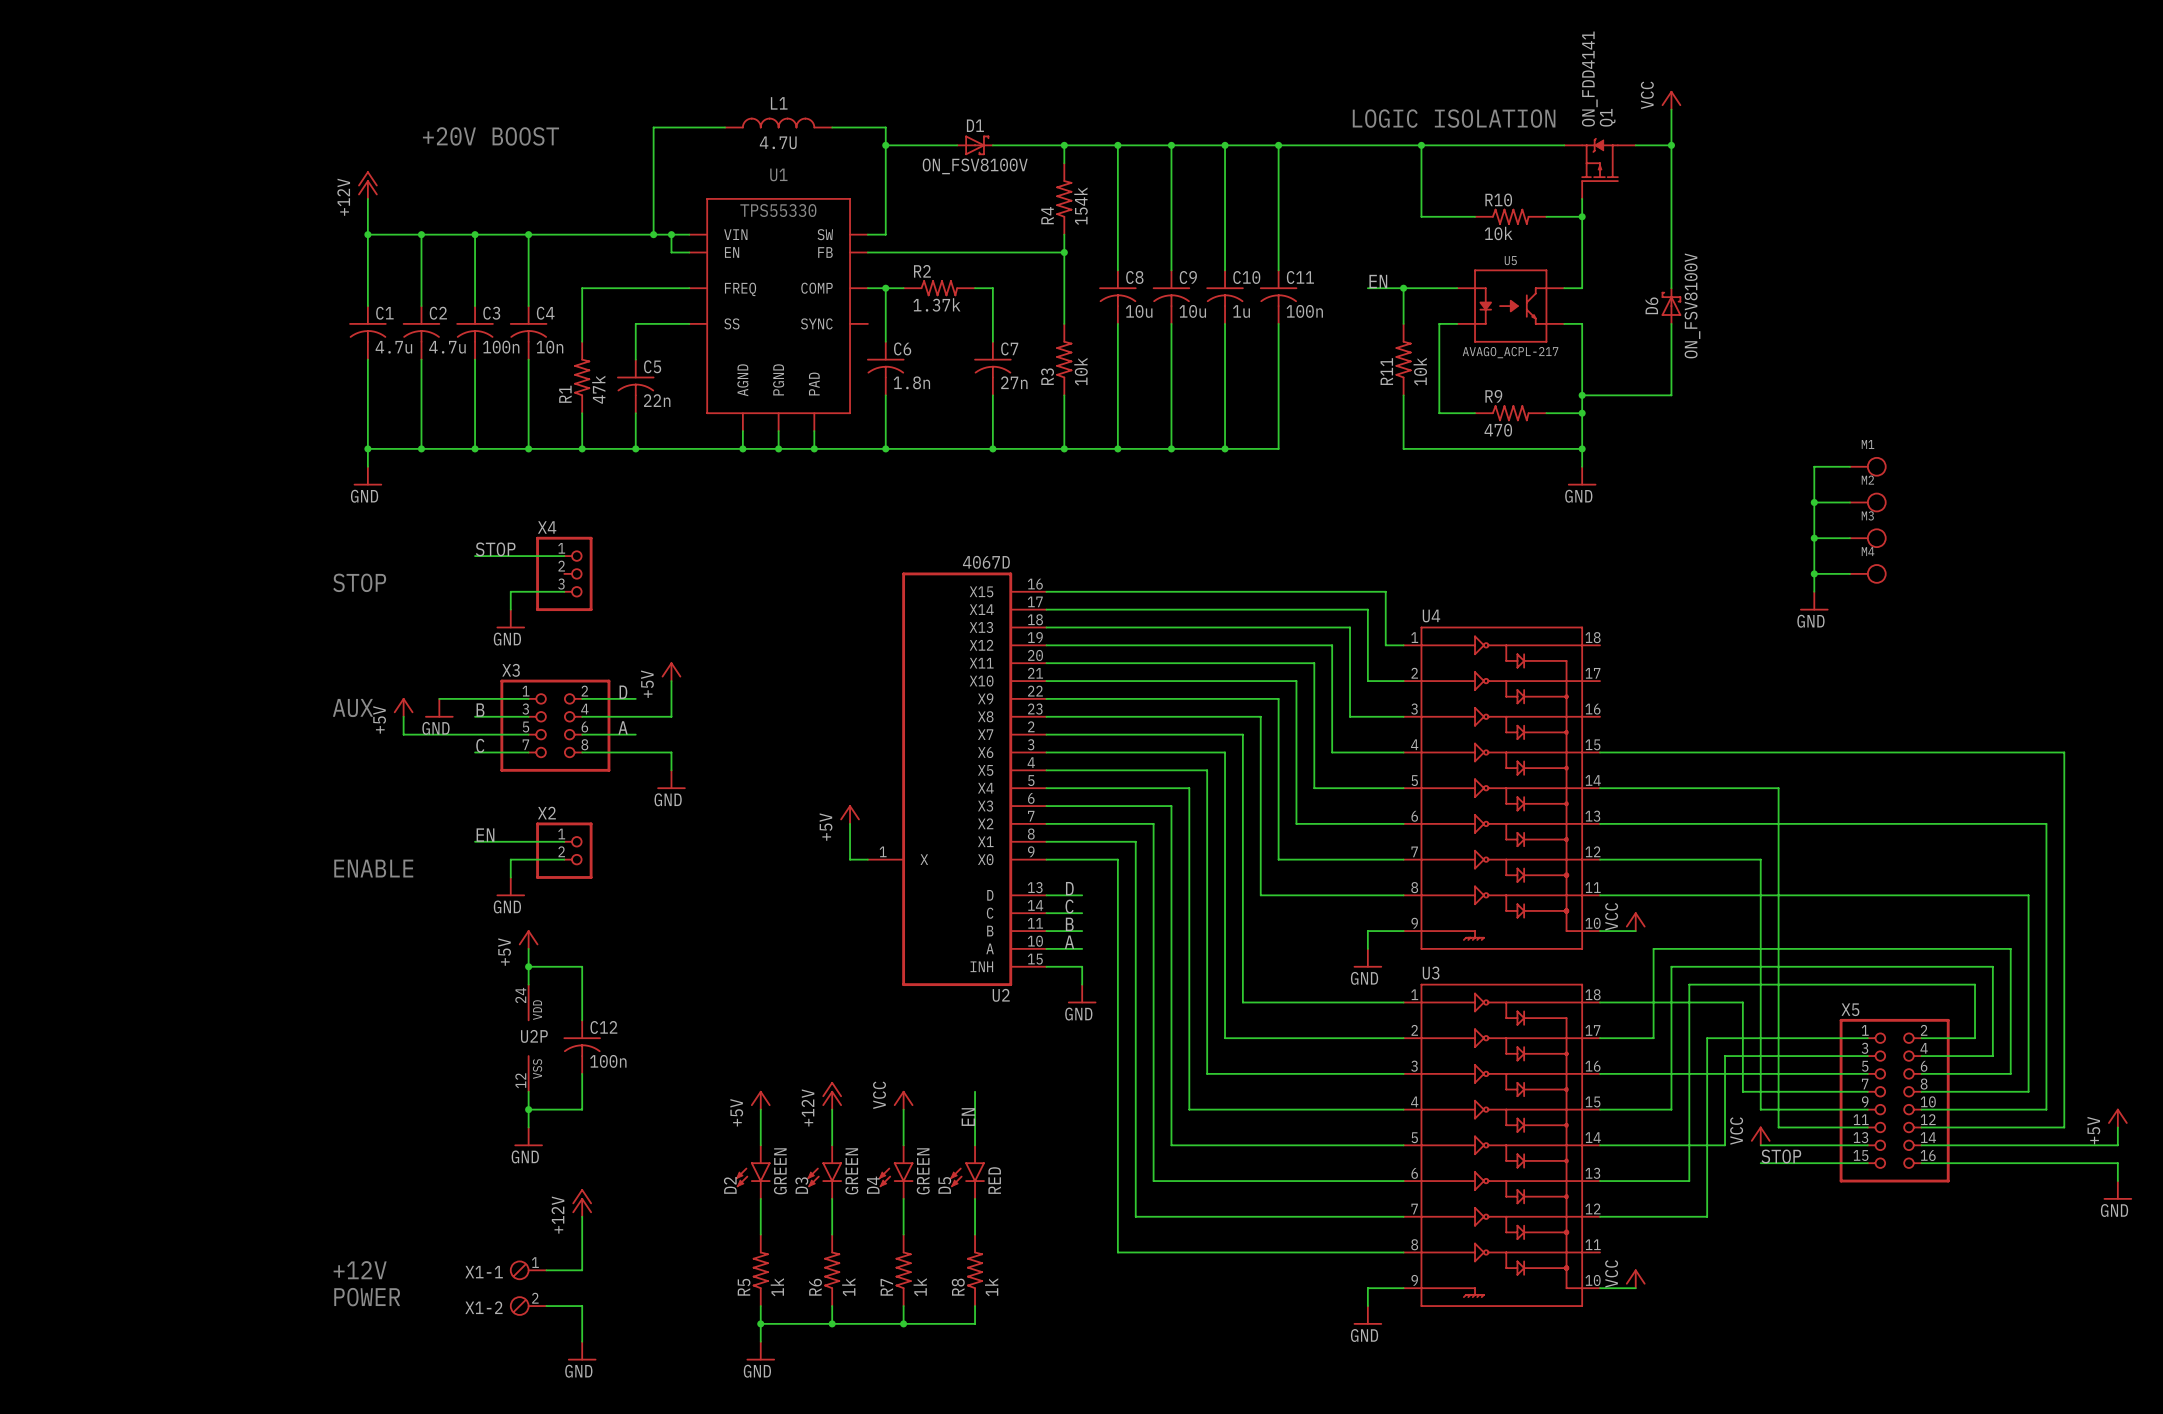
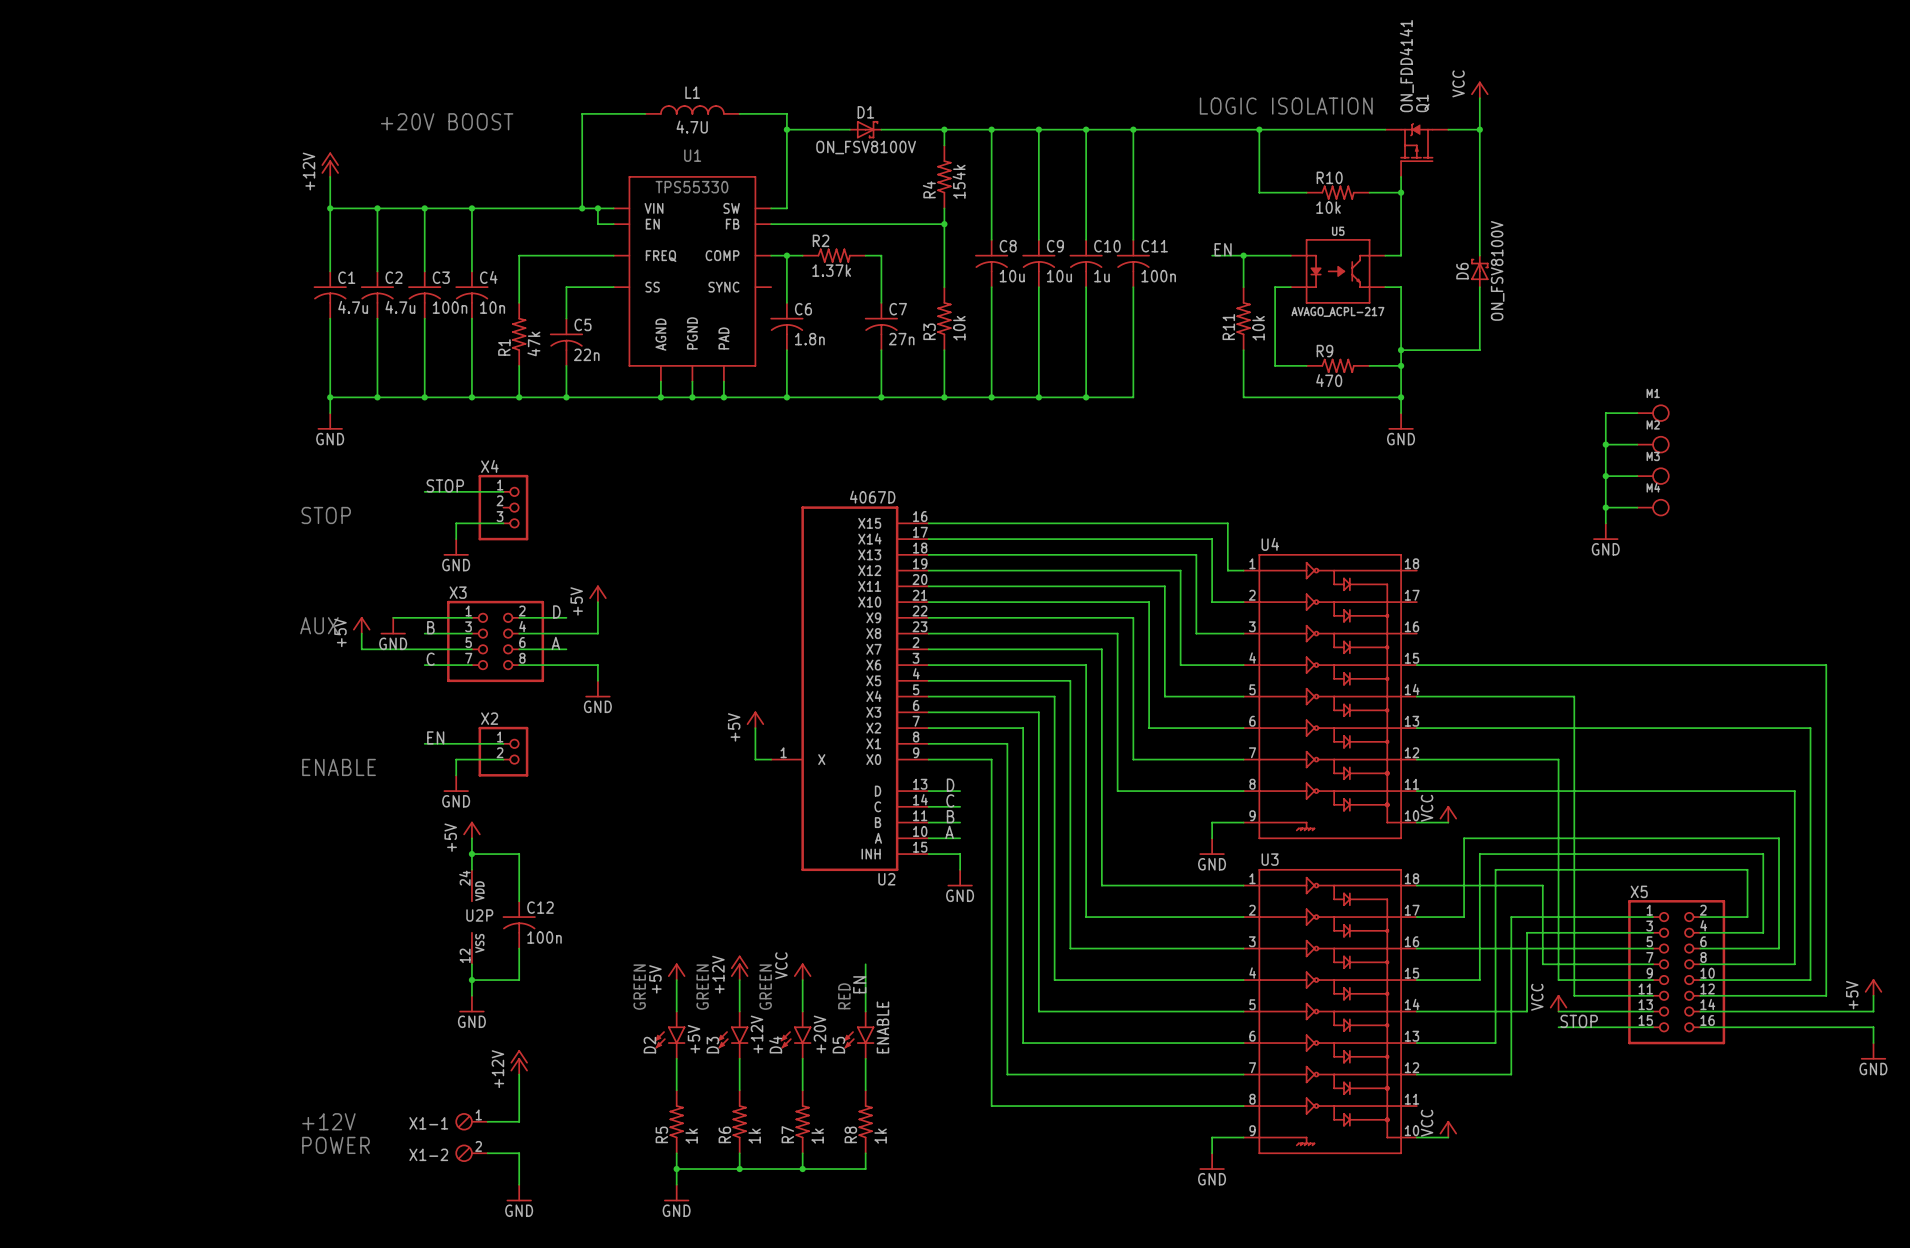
text: none -> GREEN (639, 987)
text: none -> GREEN (702, 987)
text: none -> GREEN (765, 987)
text: none -> RED (844, 996)
D2 value: GREEN (780, 1171) -> +5V (694, 1039)
D3 value: GREEN (851, 1171) -> +12V (756, 1034)
D4 value: GREEN (923, 1171) -> +20V (819, 1034)
D5 value: RED (994, 1180) -> ENABLE (882, 1027)

